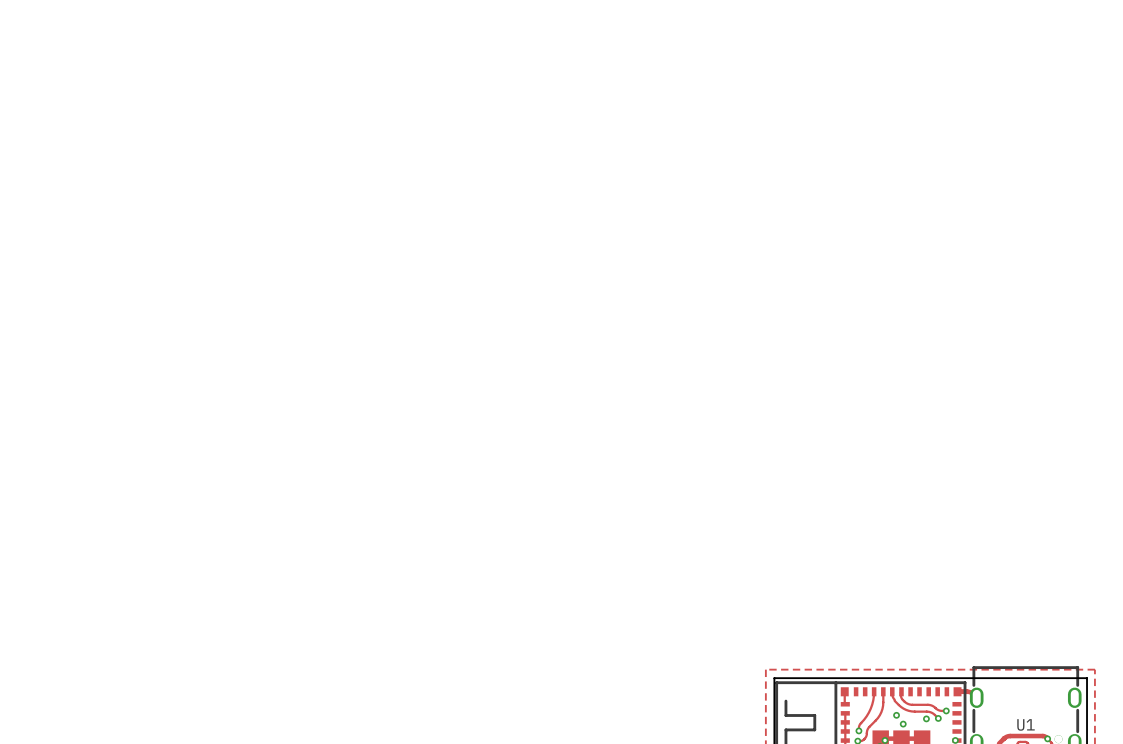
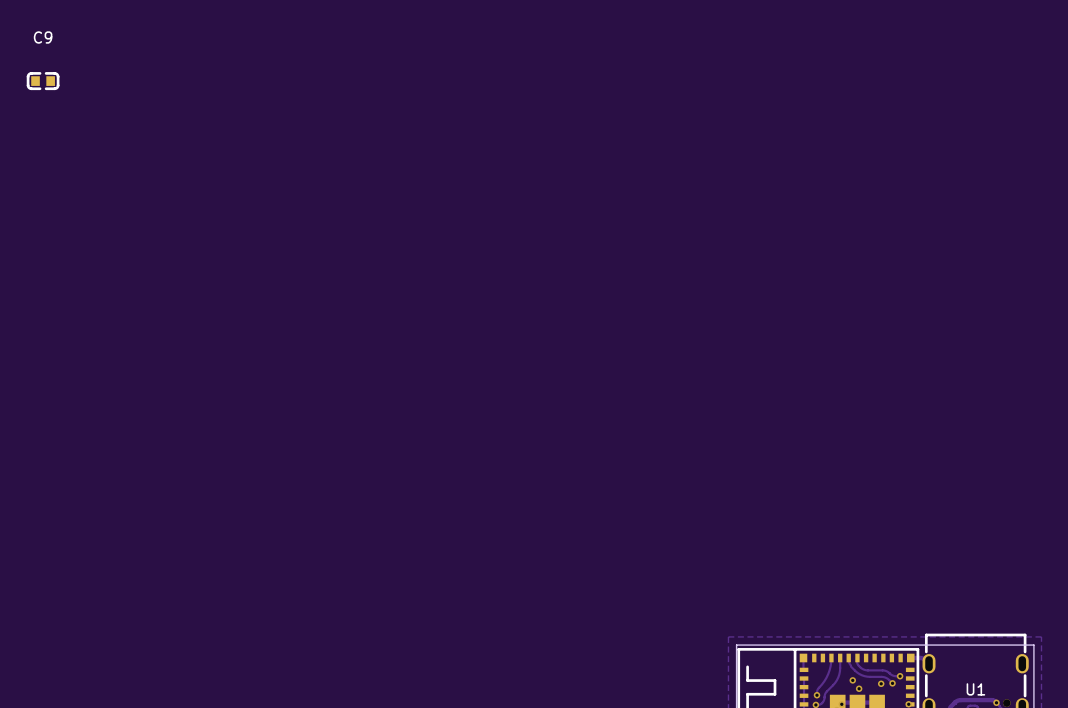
C9: none -> (43, 81)

